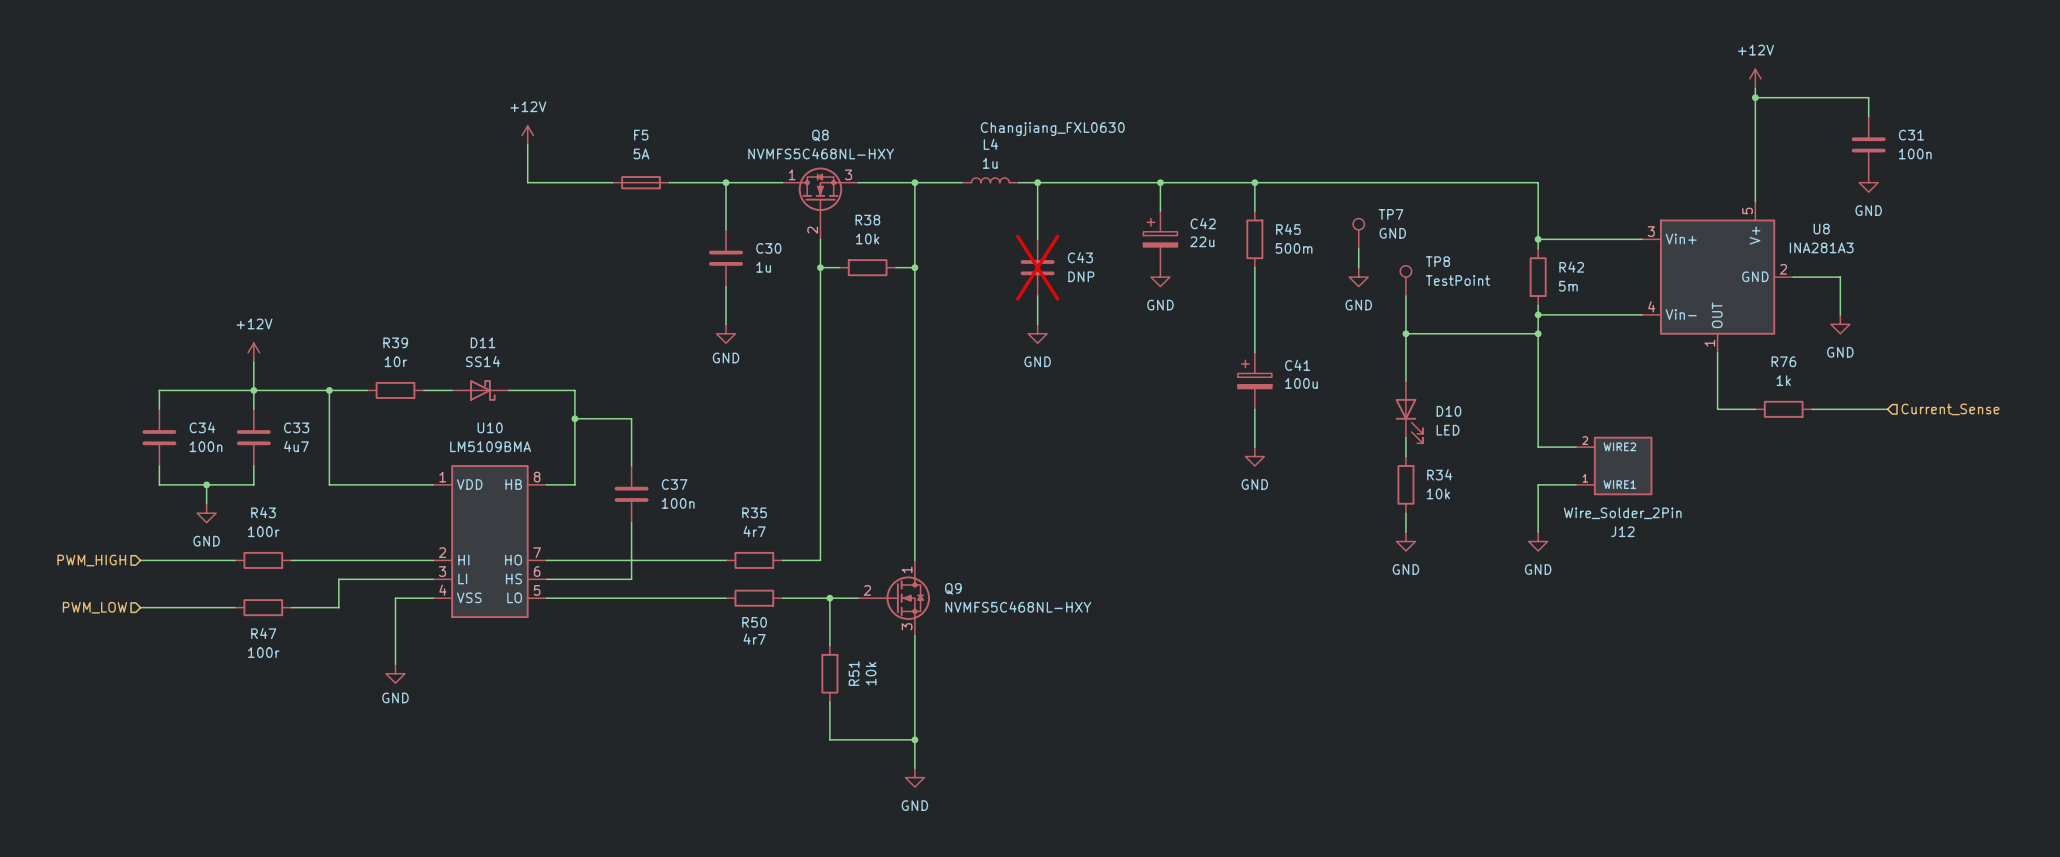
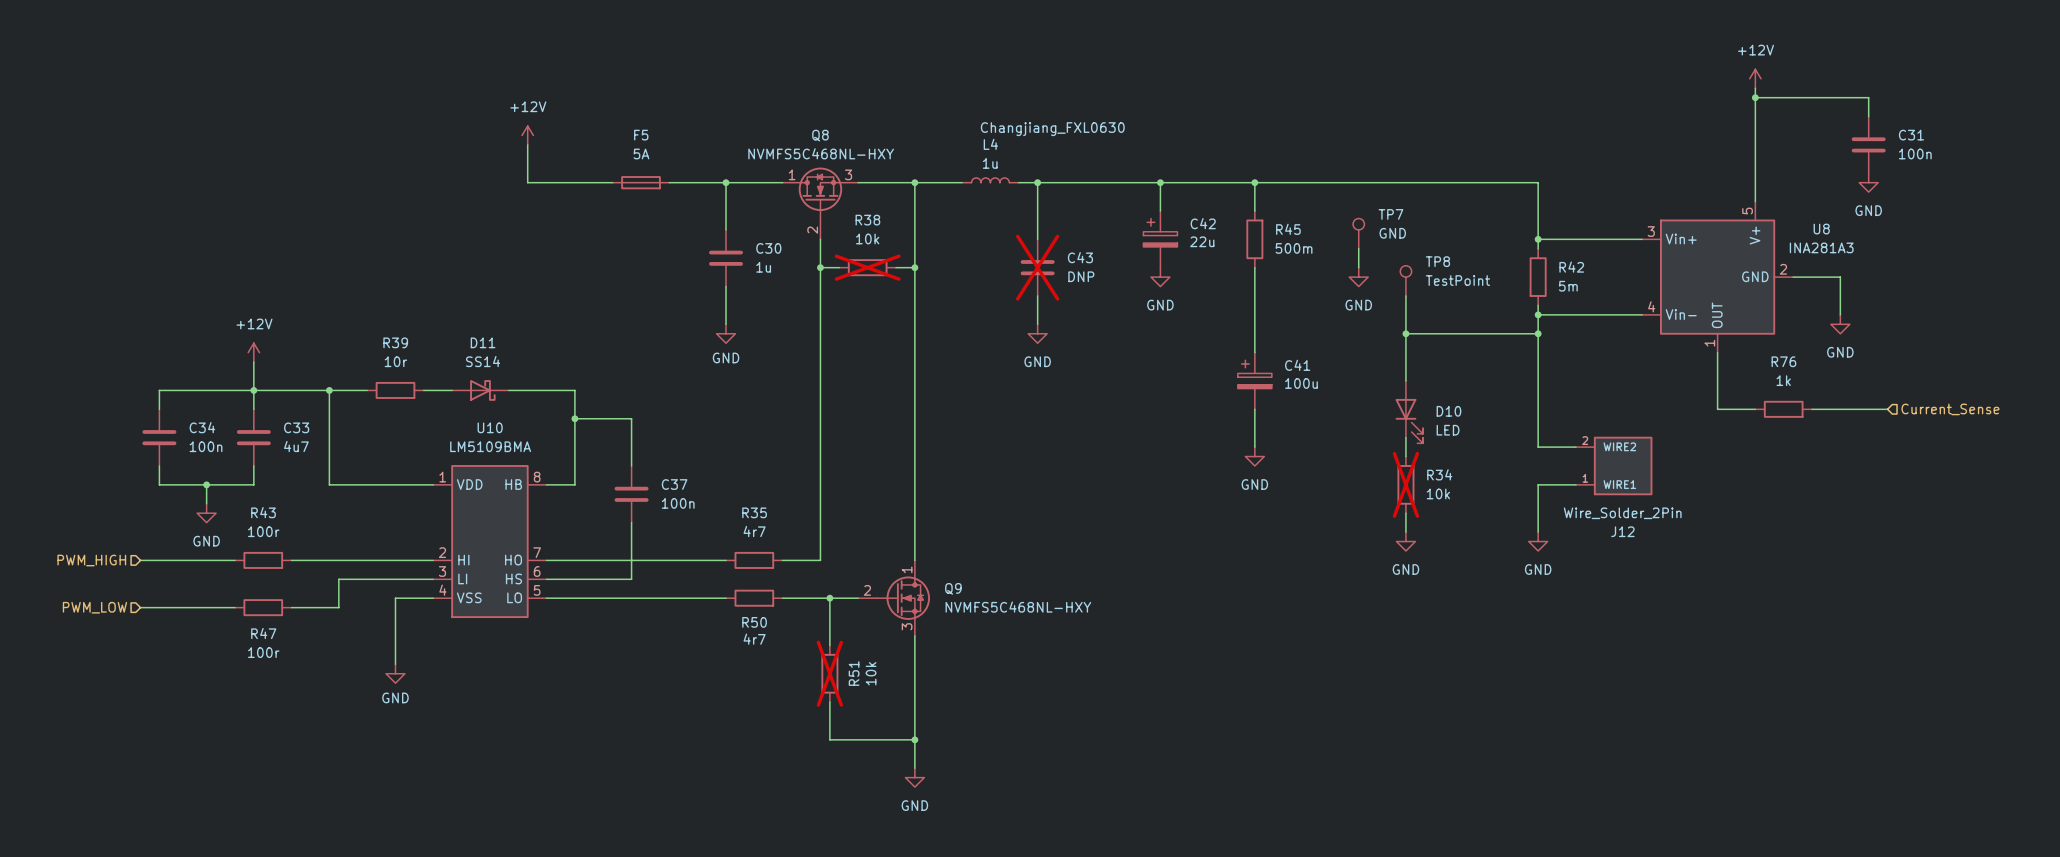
R38 do-not-place cross: none -> (867, 267)
R34 do-not-place cross: none -> (1405, 484)
R51 do-not-place cross: none -> (829, 673)

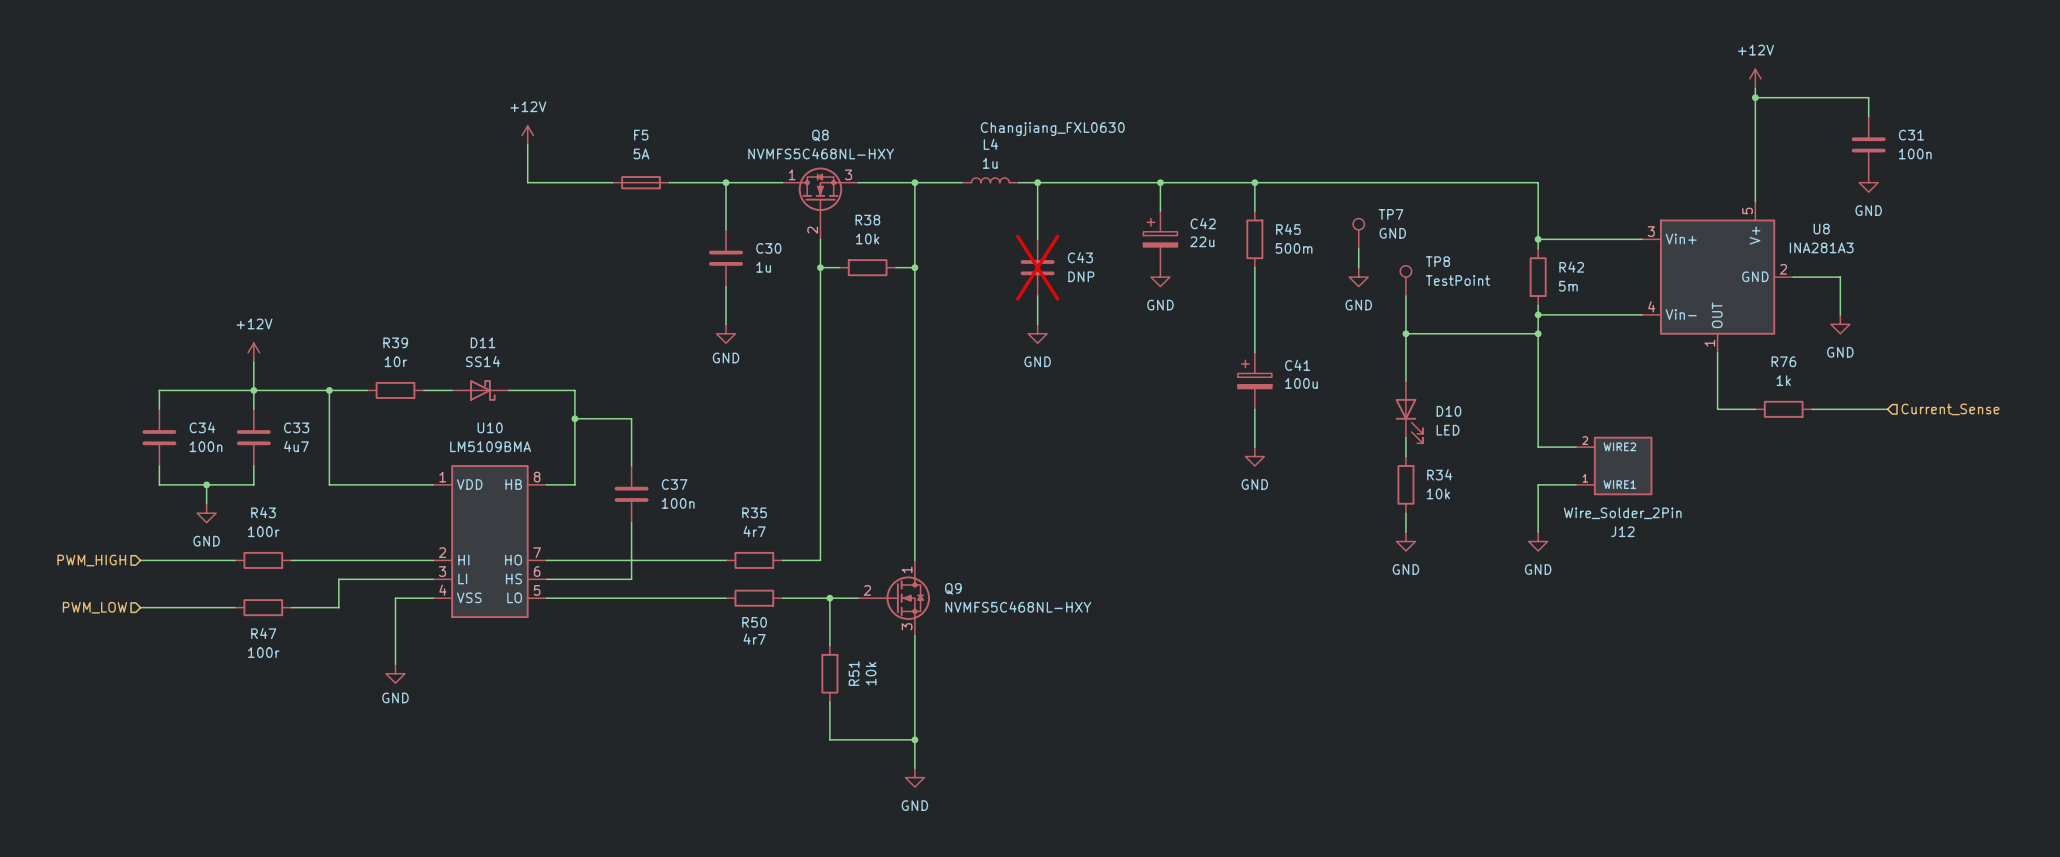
R38 do-not-place cross: (867, 267) -> none
R34 do-not-place cross: (1405, 484) -> none
R51 do-not-place cross: (829, 673) -> none

